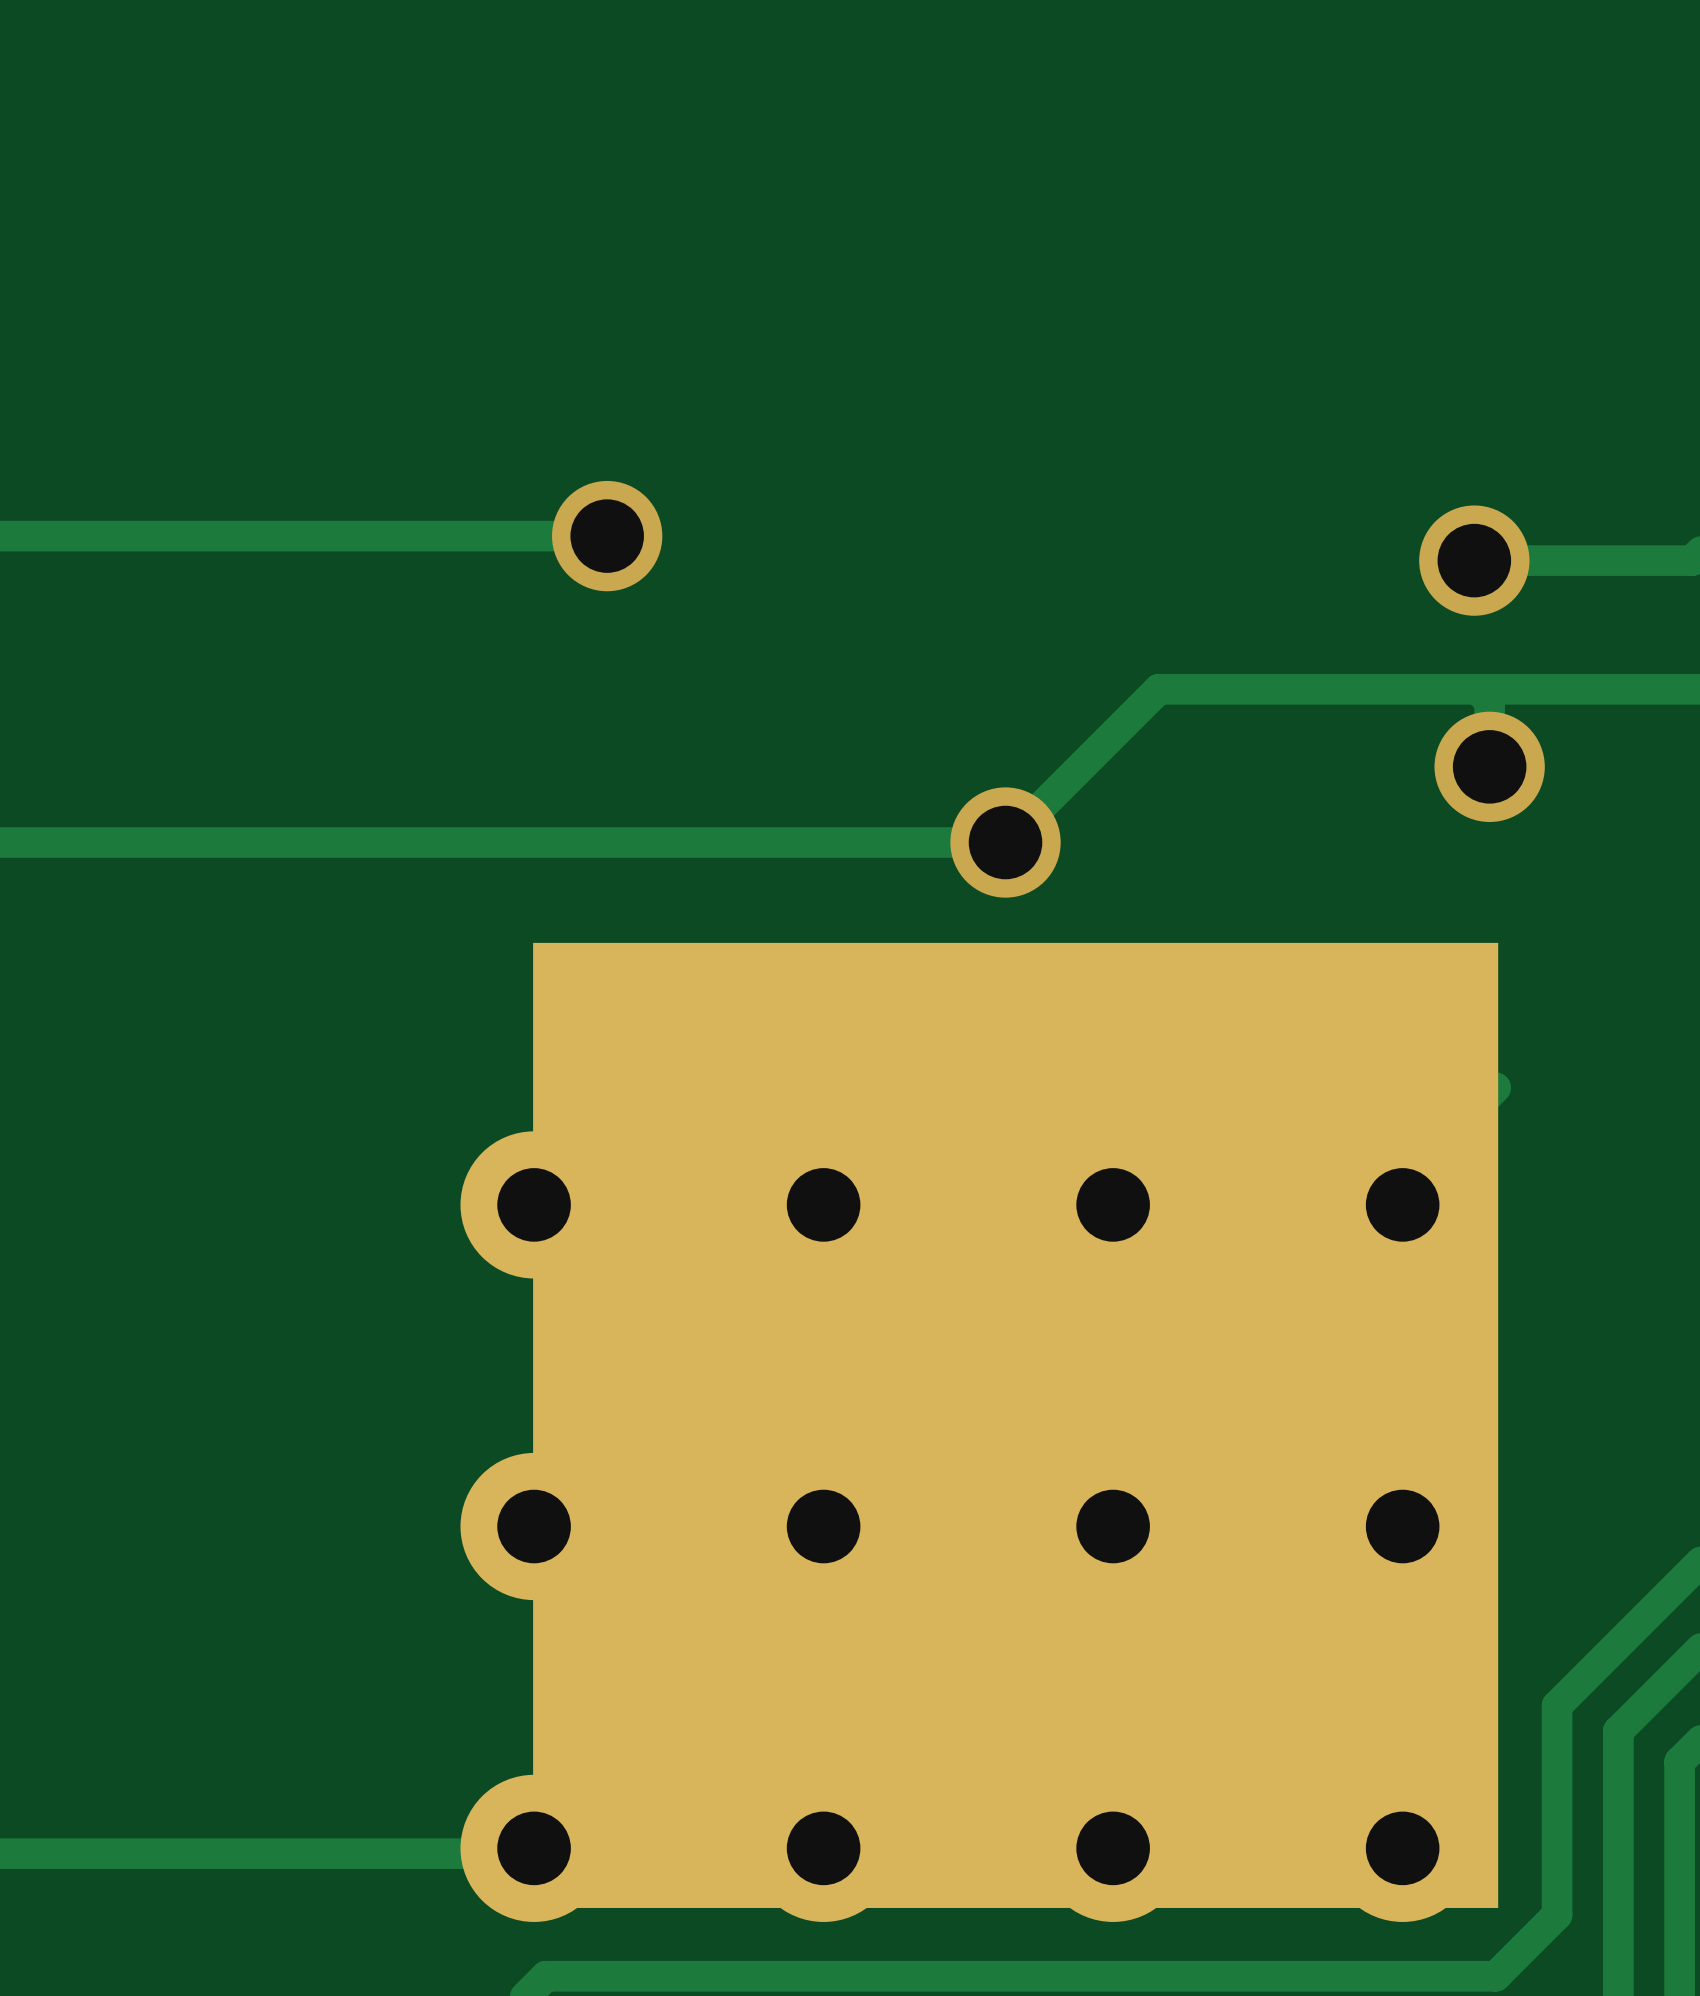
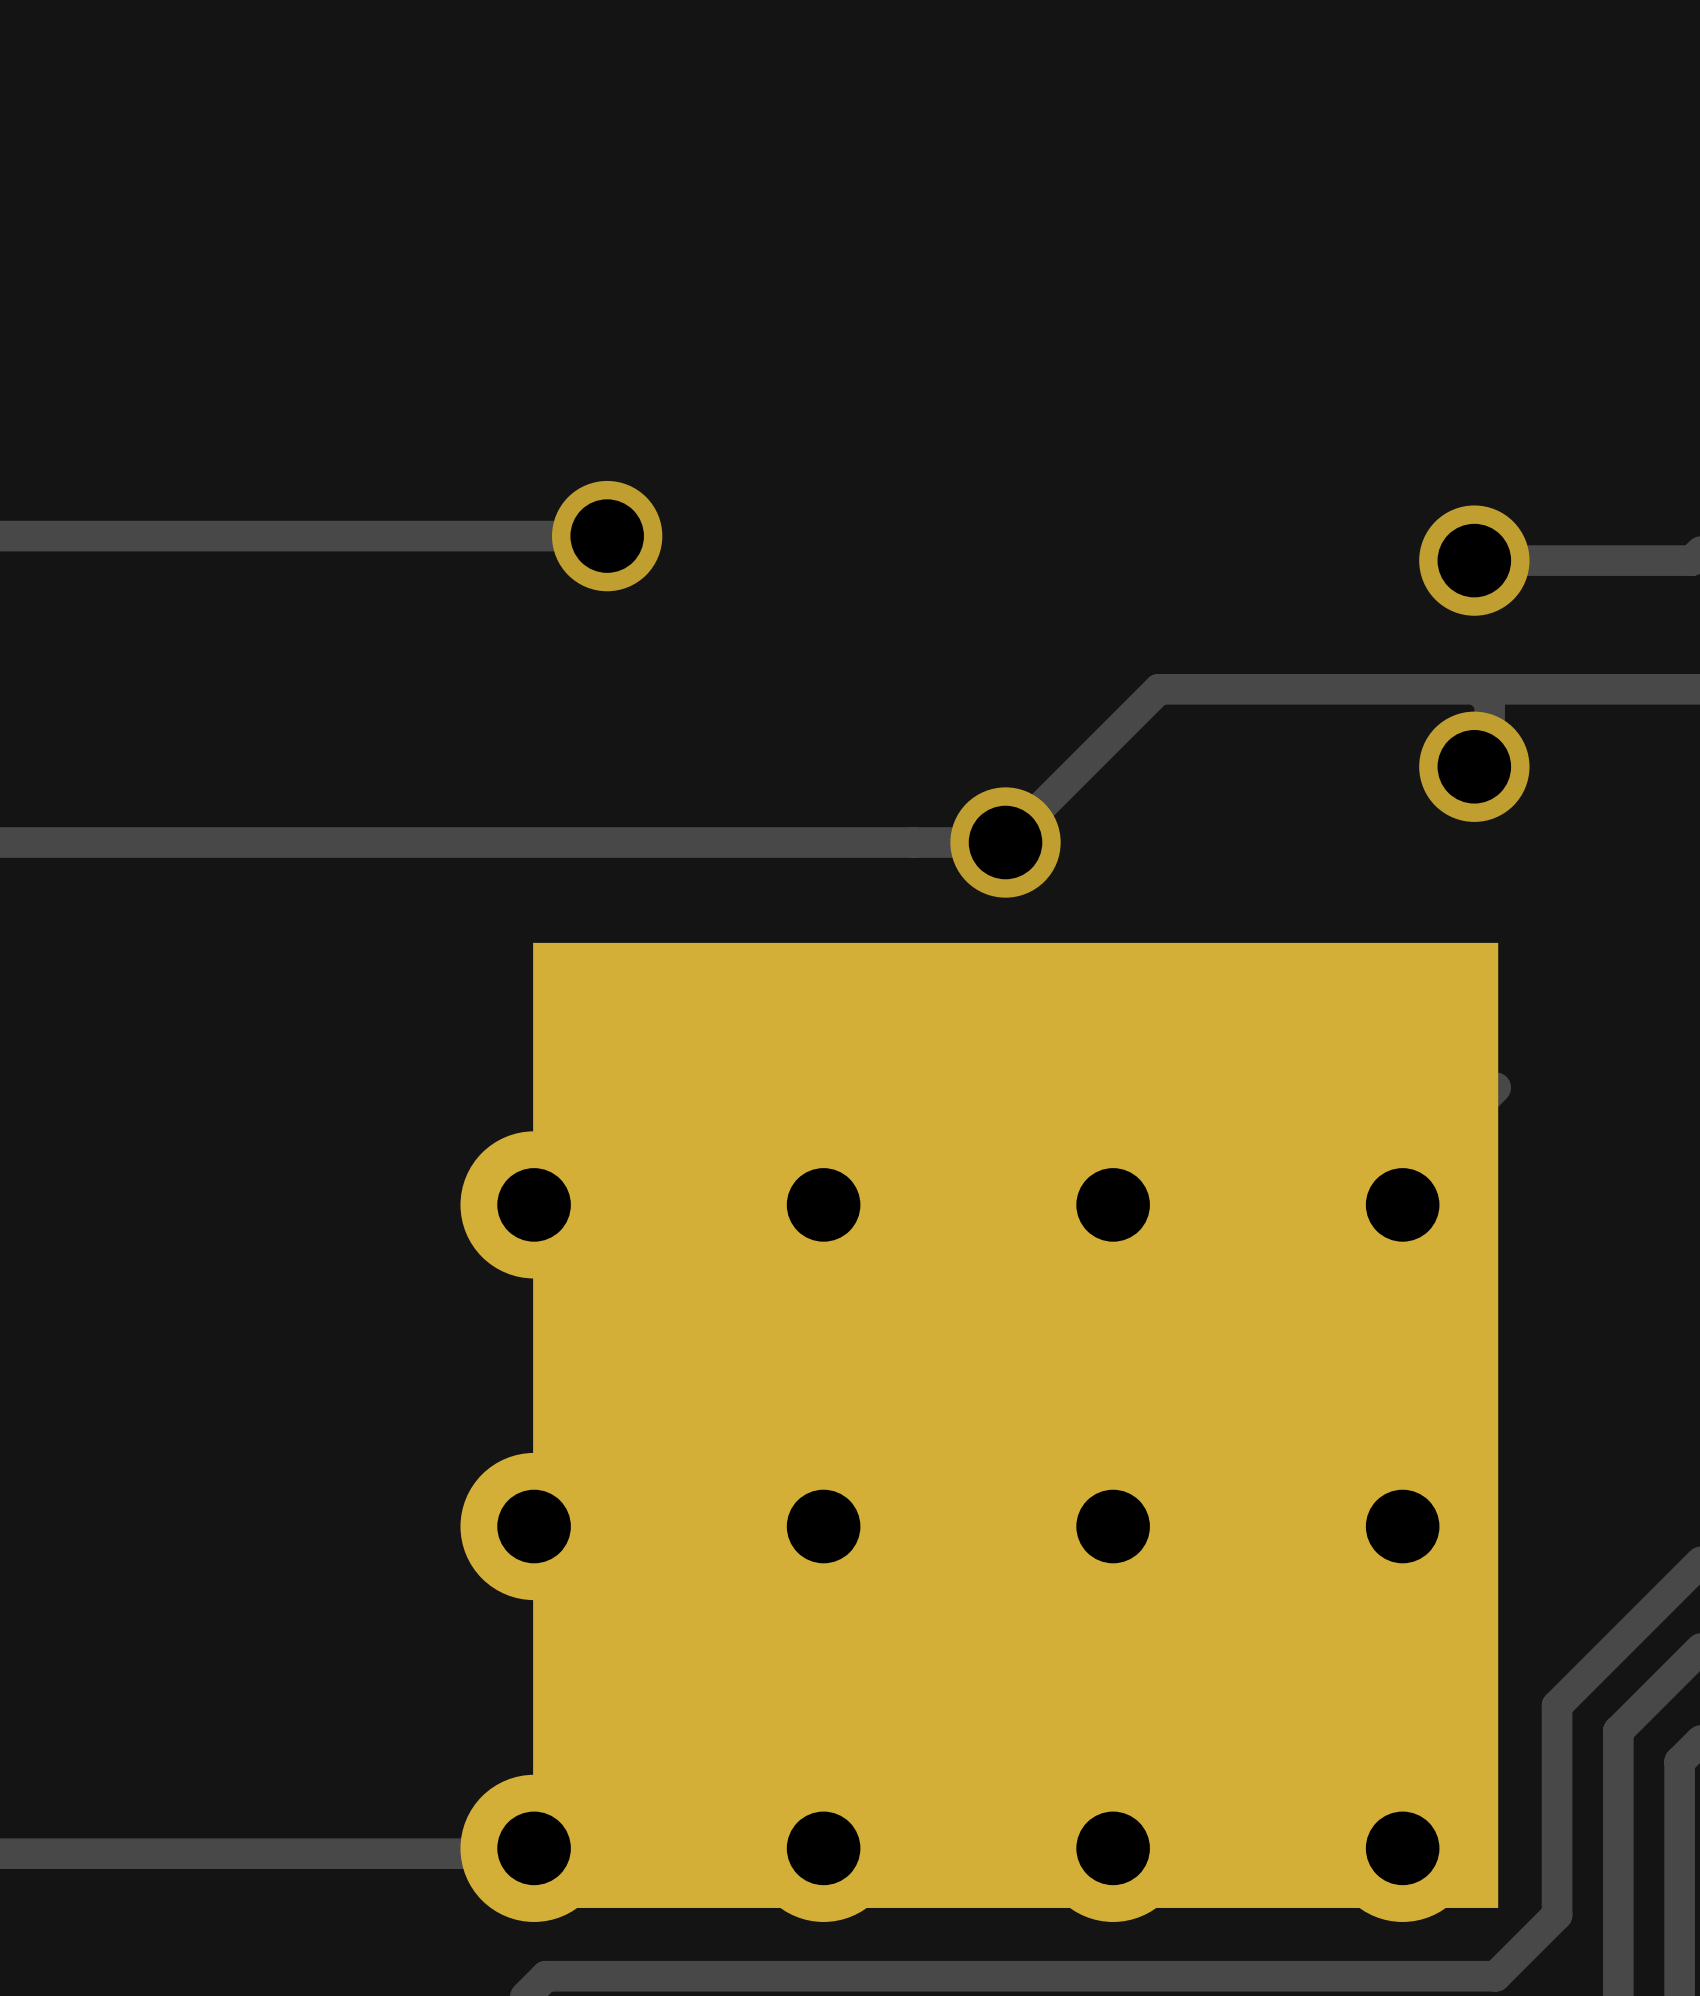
via position: (1489, 766) -> (1474, 766)

